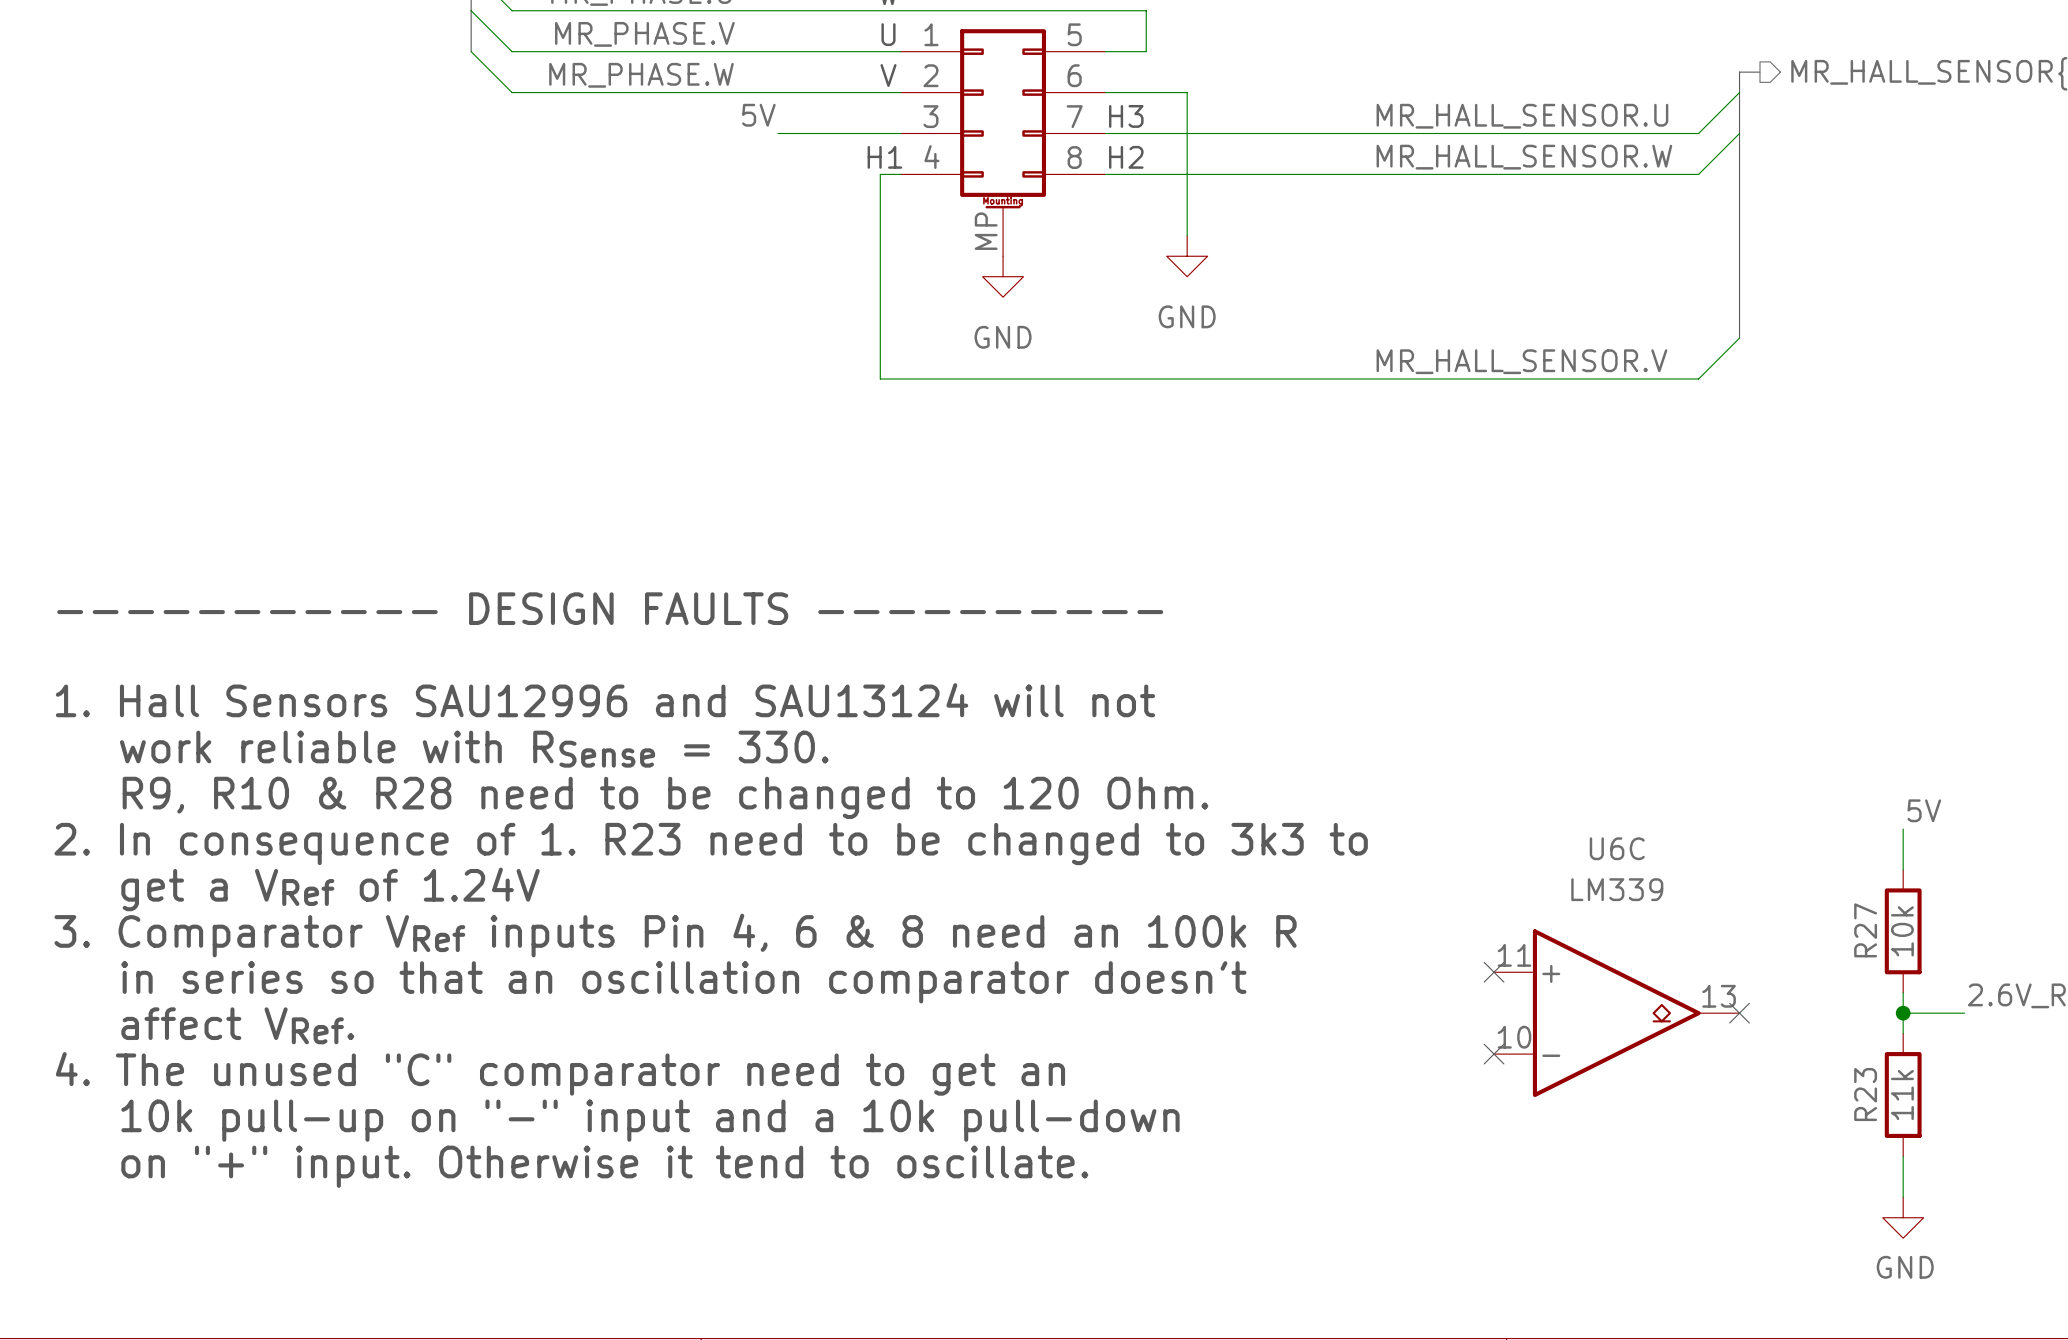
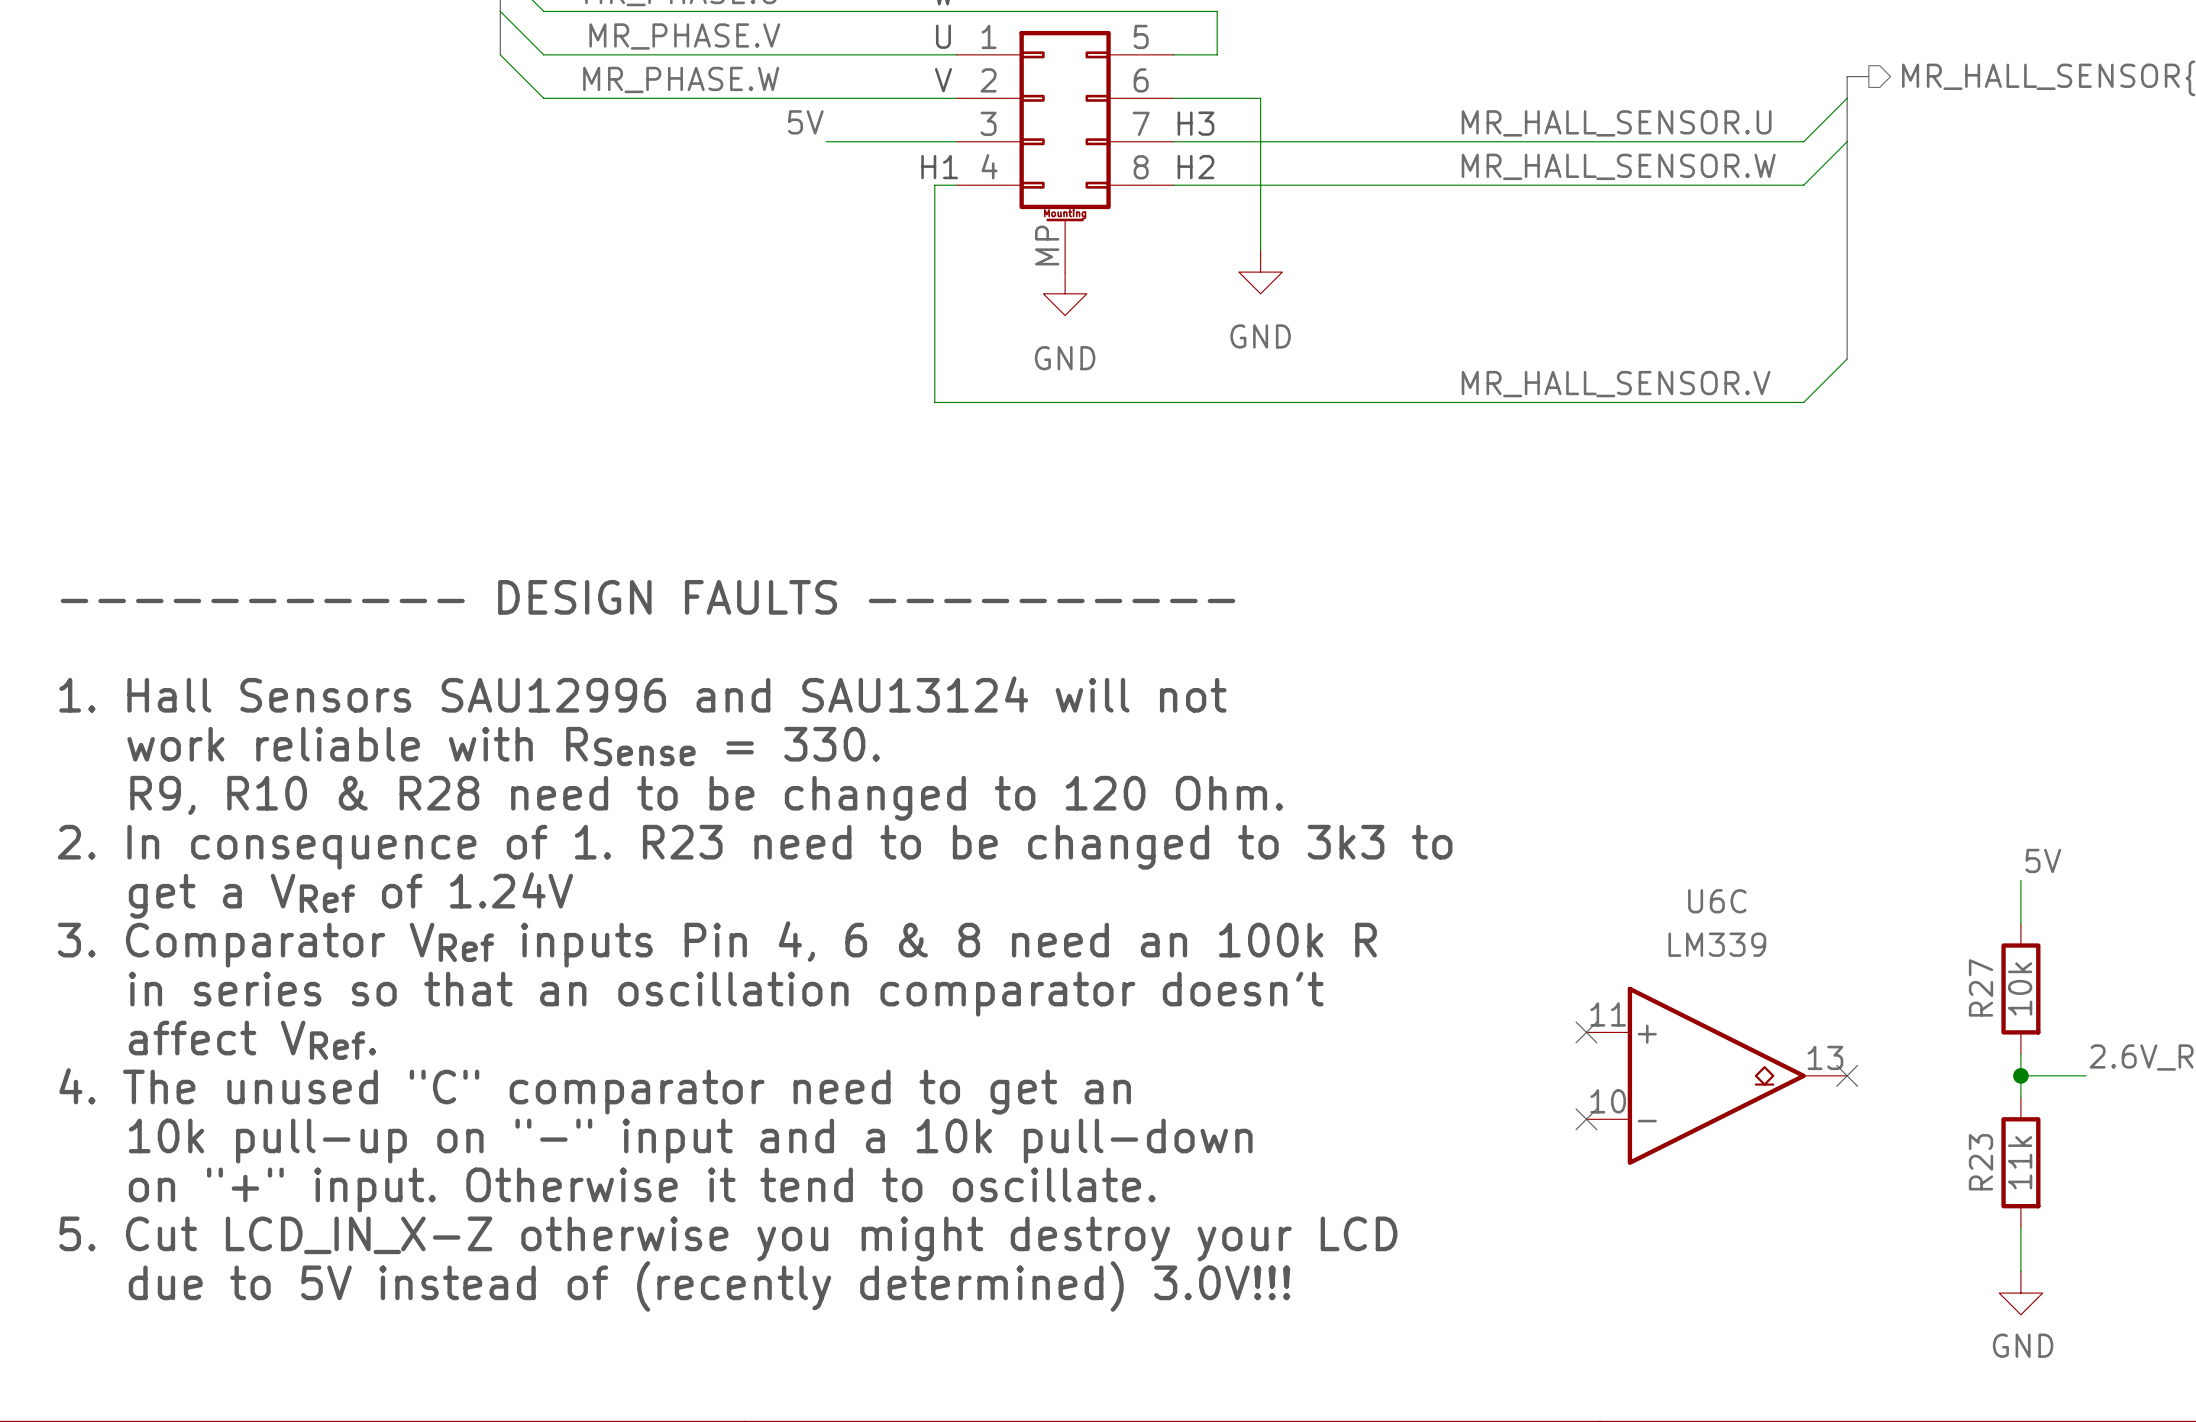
text position: ----------- DESIGN FAULTS ---------- (610, 608) -> ----------- DESIGN FAULTS ---------- (647, 597)
text: none -> 1. Hall Sensors SAU12996 and SAU13124 will not (642, 694)
text: 1. Hall Sensors SAU12996 and SAU13124 will not (605, 700) -> work reliable with RSense = 330. (503, 746)
text: work reliable with RSense = 330. (474, 749) -> R9, R10 & R28 need to be changed to 120 Ohm. (706, 798)
text: R9, R10 & R28 need to be changed to 120 Ohm. (665, 797) -> 2. In consequence of 1. R23 need to be changed to 3k3 to (755, 847)
text: 2. In consequence of 1. R23 need to be changed to 3k3 to (711, 843) -> get a VRef of 1.24V (350, 895)
text: get a VRef of 1.24V (330, 889) -> 3. Comparator VRef inputs Pin 4, 6 & 8 need an 100k R (717, 944)
text: 3. Comparator VRef inputs Pin 4, 6 & 8 need an 100k R (675, 935) -> in series so that an oscillation comparator doesn't (726, 994)
text: in series so that an oscillation comparator doesn't (683, 982) -> affect VRef. (252, 1040)
text: affect VRef. (237, 1025) -> 4. The unused "C" comparator need to get an (595, 1091)
text: 4. The unused "C" comparator need to get an (560, 1073) -> 10k pull-up on "-" input and a 10k pull-down (690, 1141)
text: 10k pull-up on "-" input and a 10k pull-down (650, 1120) -> on "+" input. Otherwise it tend to oscillate. (642, 1189)
text: on "+" input. Otherwise it tend to oscillate. (604, 1166) -> 5. Cut LCD_IN_X-Z otherwise you might destroy your LCD (728, 1238)
text: none -> due to 5V instead of (recently determined) 3.0V!!! (709, 1286)

